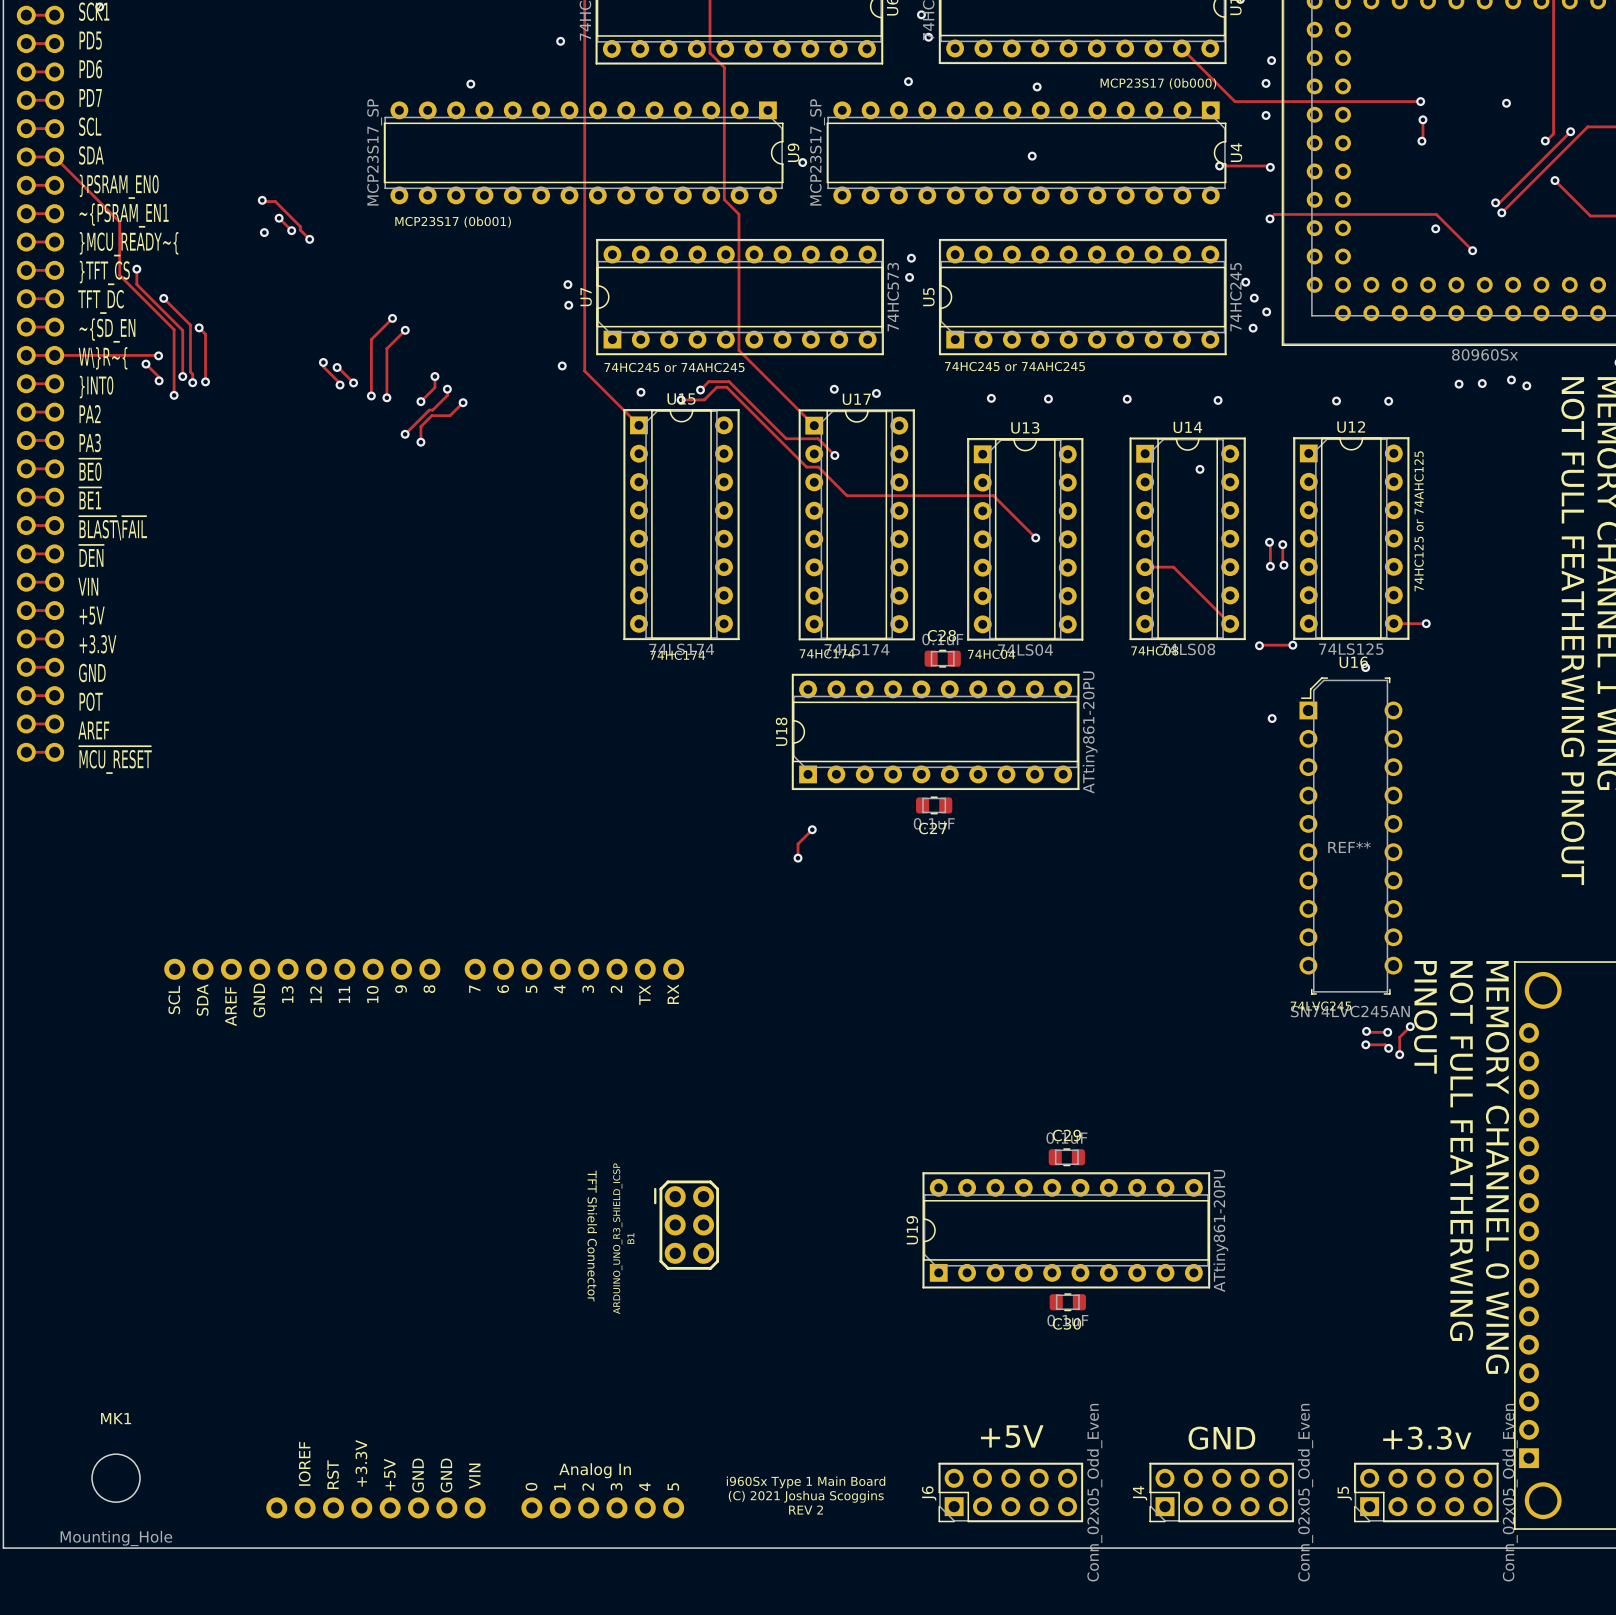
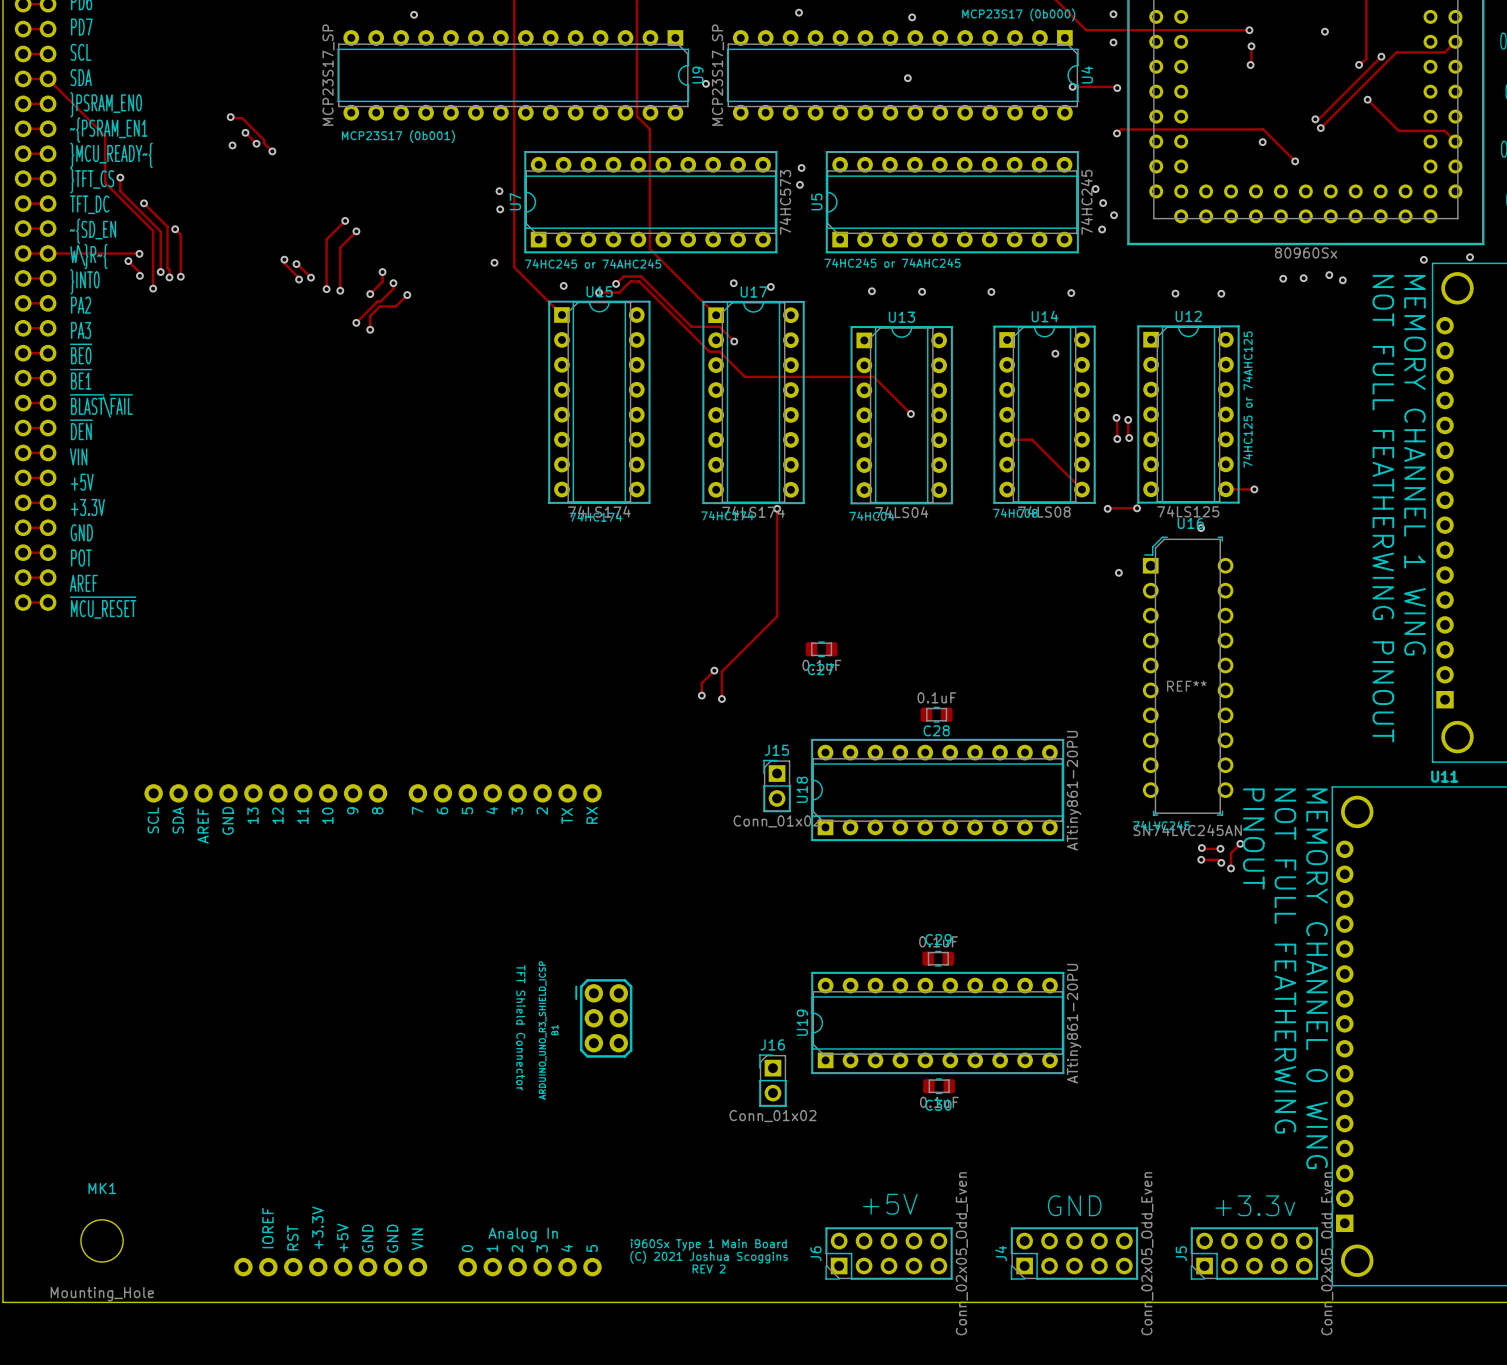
C28 name position: C28 (941, 635) -> C28 (936, 730)
track: none -> (777, 508) (777, 616) (721, 671) (721, 699)
via: none -> (777, 508)
C28 position: (942, 658) -> (936, 714)
U18 position: (935, 731) -> (937, 790)
via: none -> (721, 699)
J15: none -> Conn_01x02 (777, 785)
J16: none -> Conn_01x02 (772, 1080)

